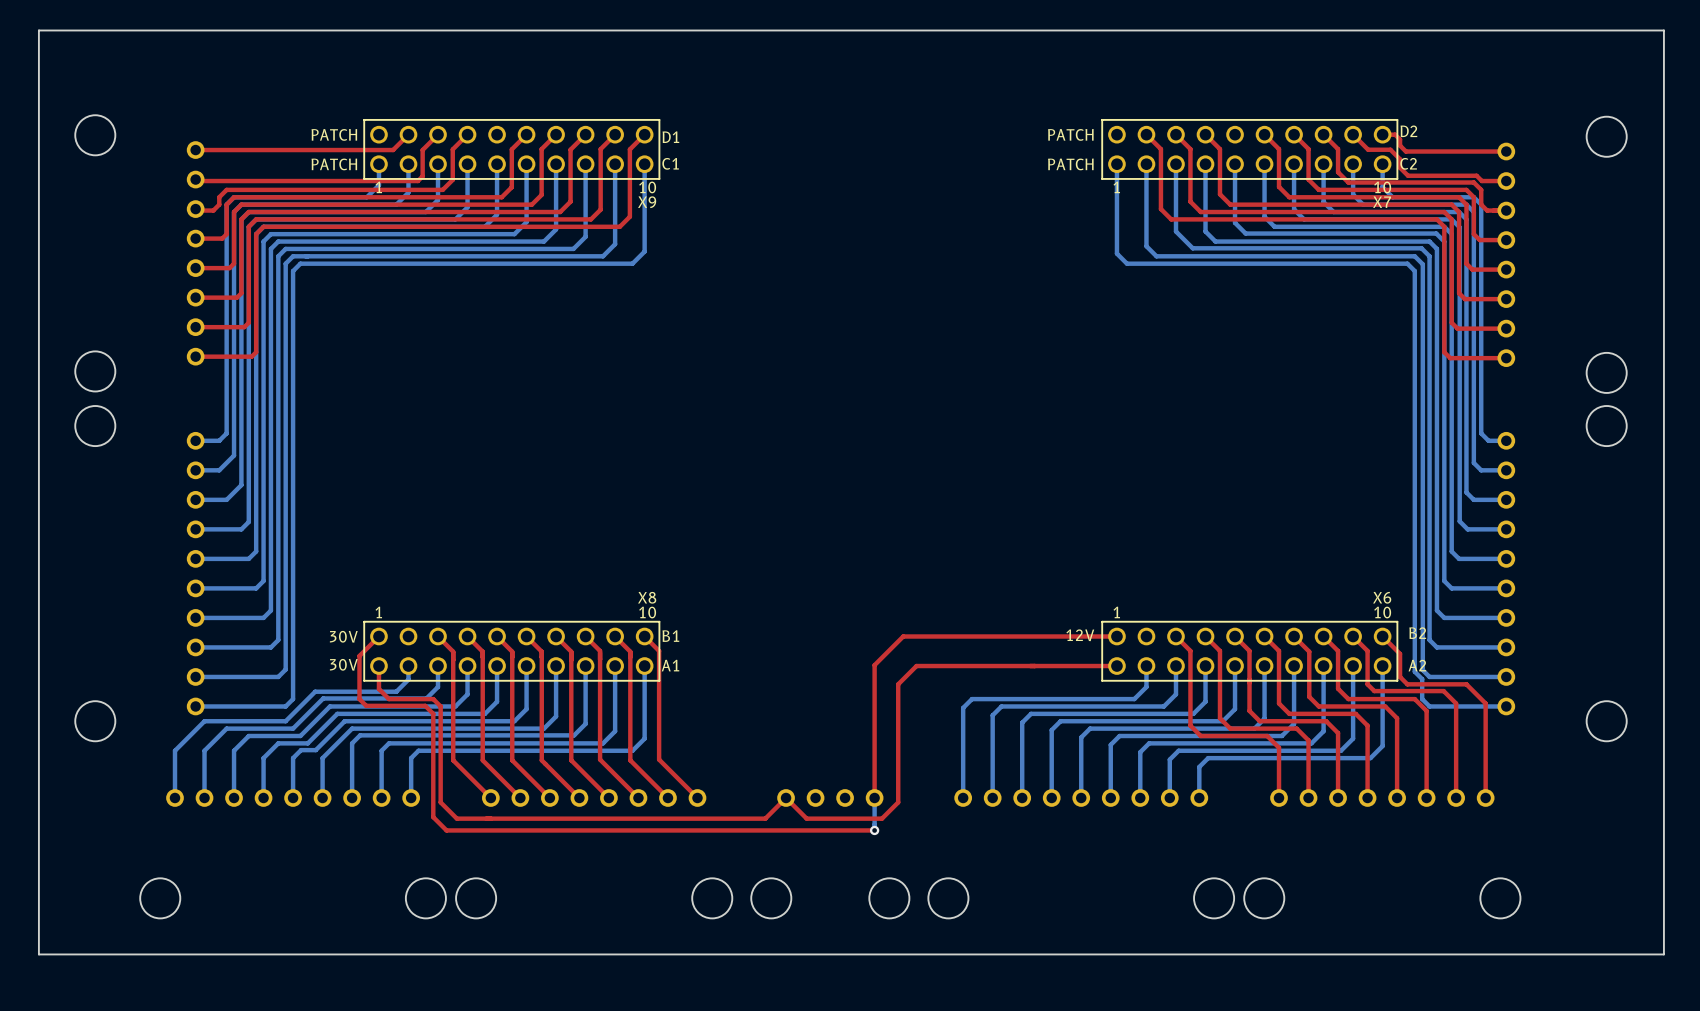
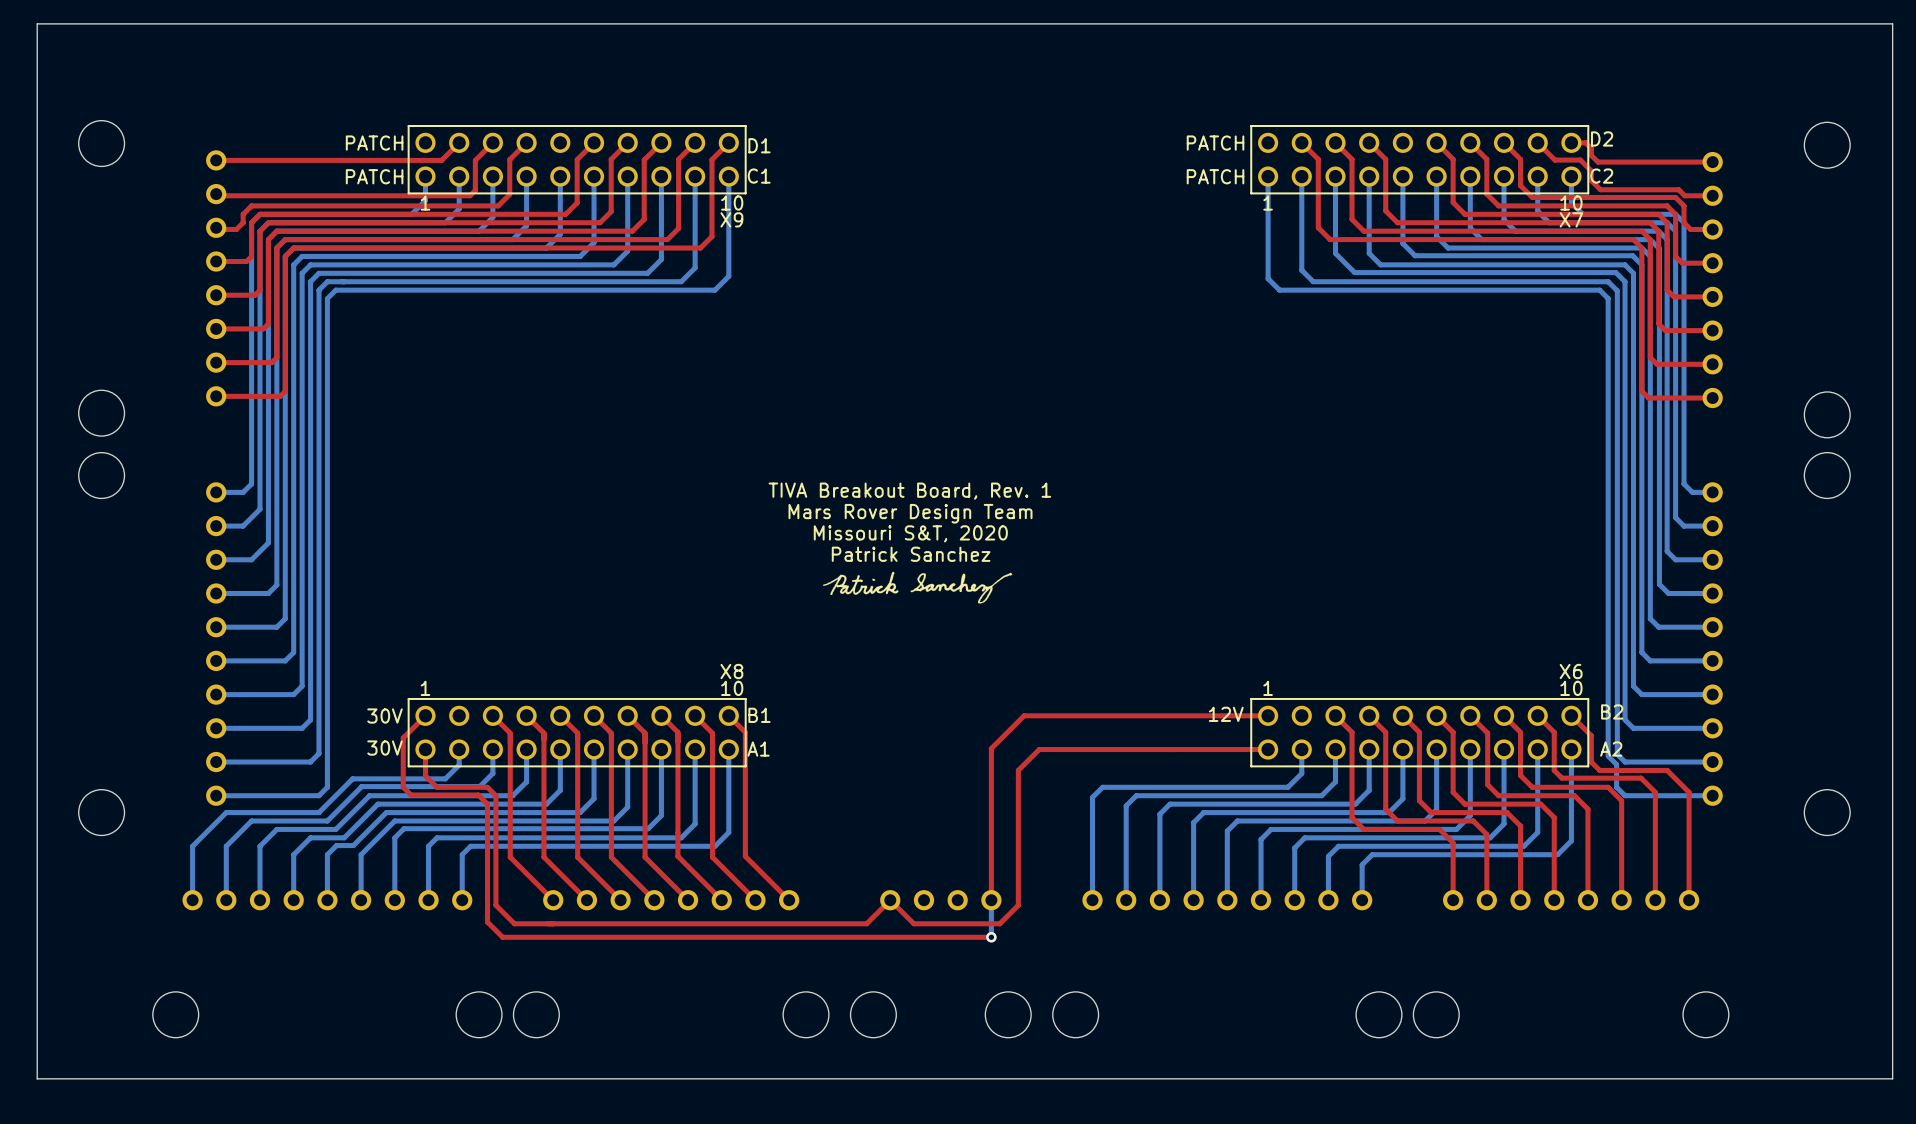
text: none -> TIVA Breakout Board, Rev. 1 (909, 491)
text: none -> Mars Rover Design Team (910, 513)
text: none -> Missouri S&T, 2020 (910, 533)
text: none -> Patrick Sanchez (911, 554)
drawing: none -> [823, 571, 1013, 604]

